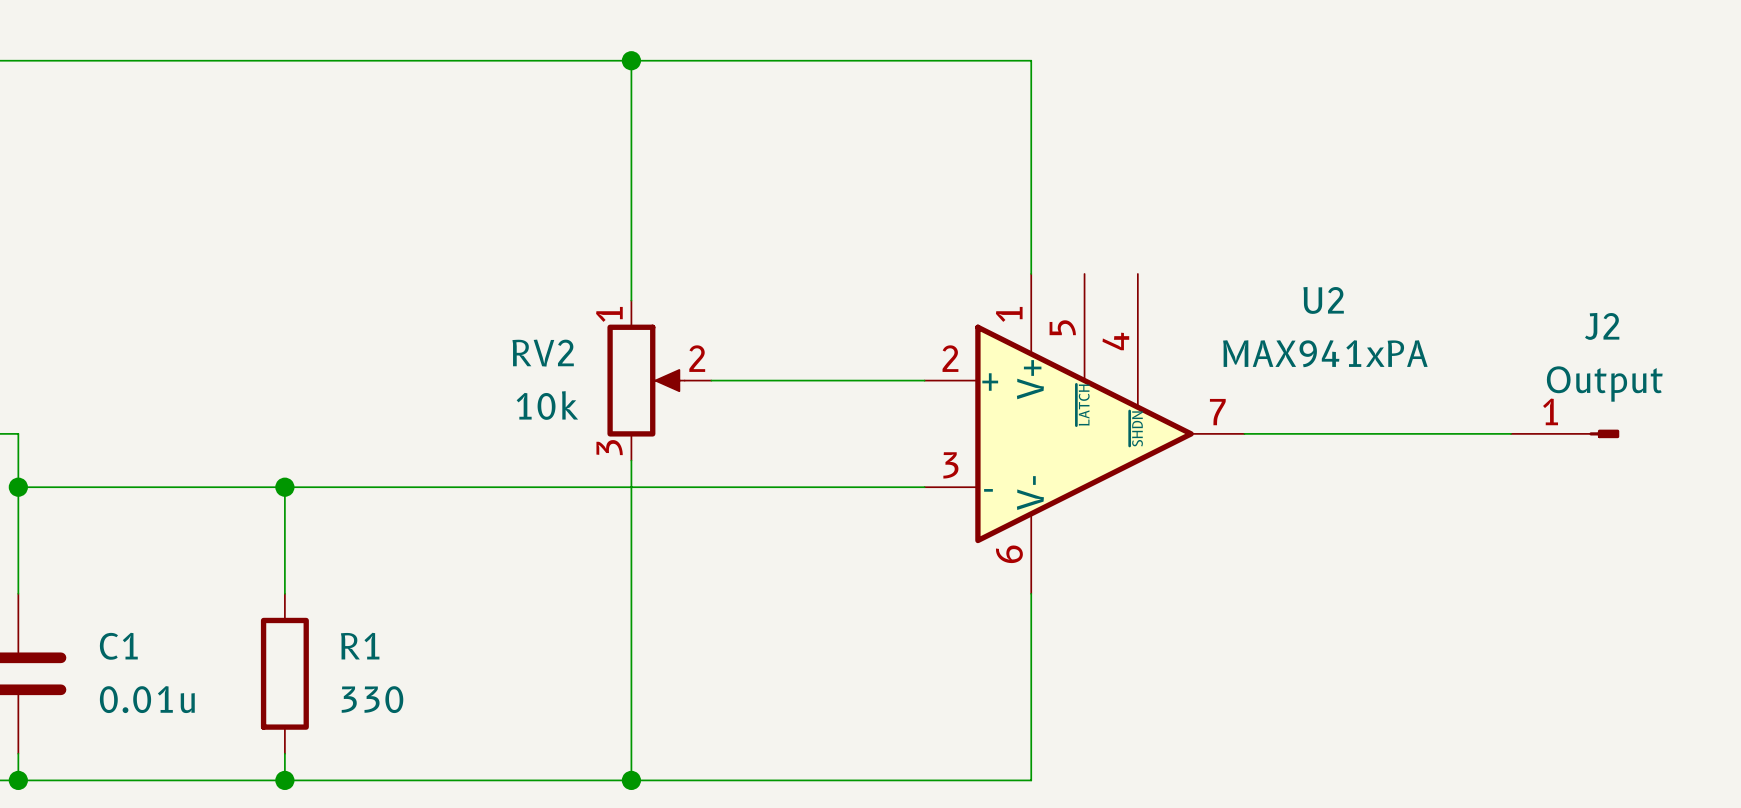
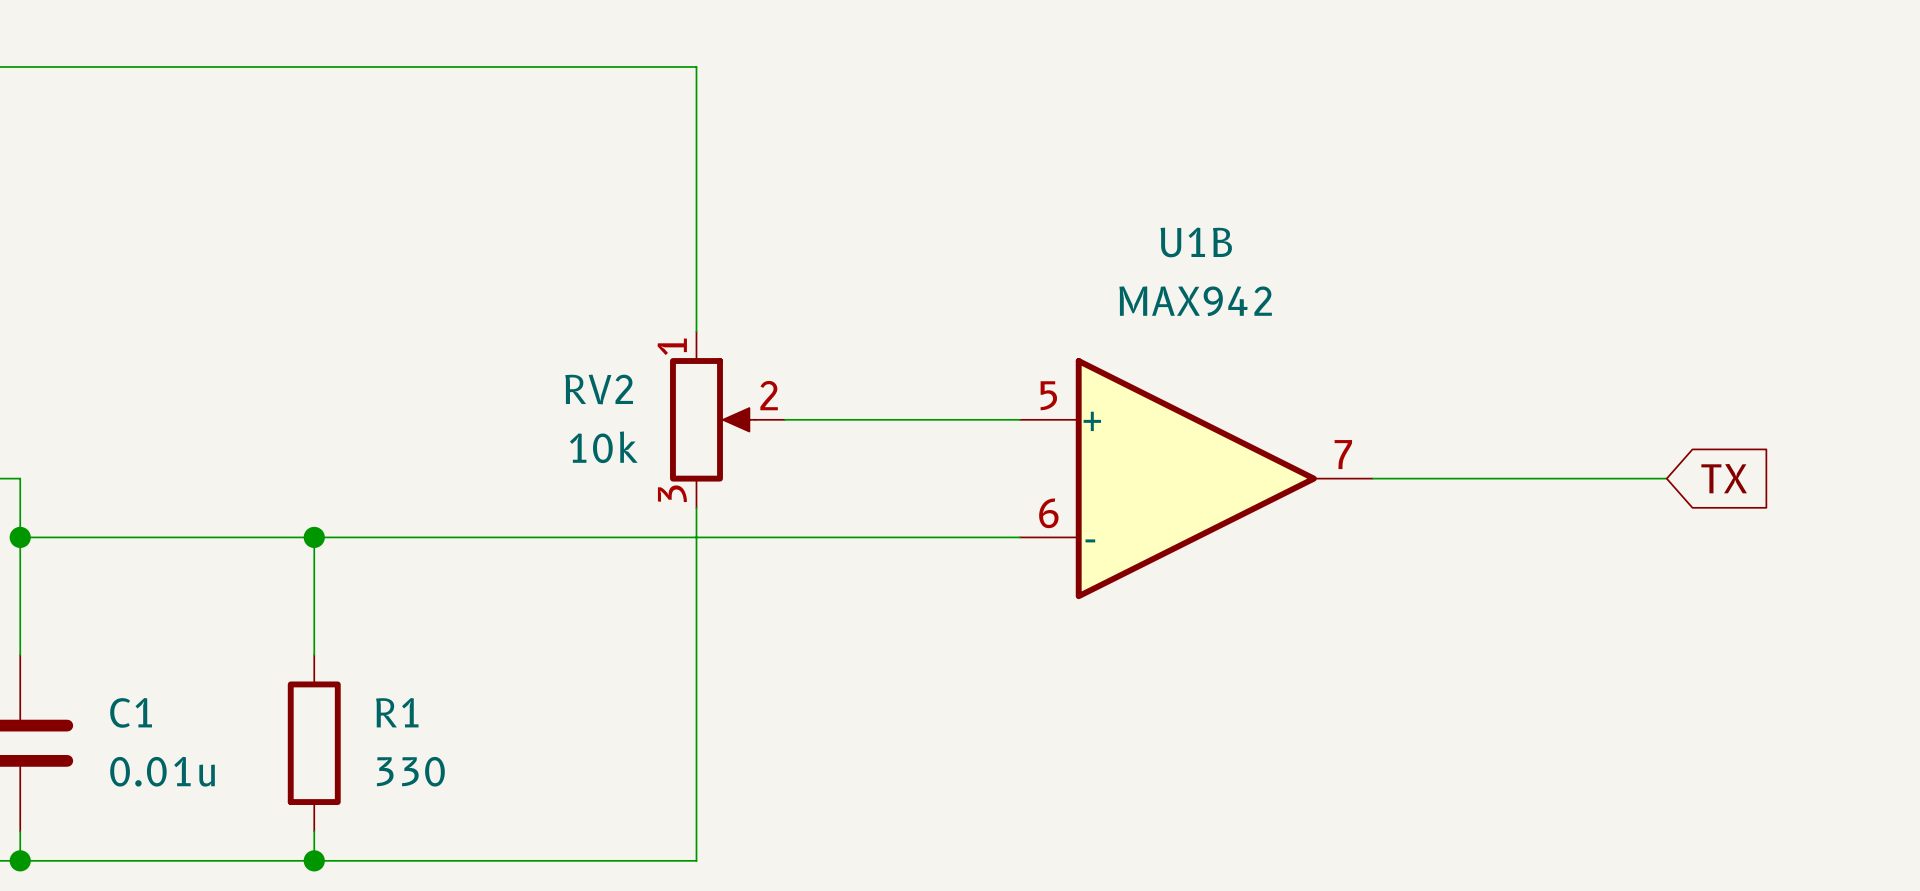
wire: (631, 60) (1031, 60) (1031, 273) -> none
junction: (631, 60) -> none
U2: MAX941xPA (1084, 433) -> none
U1B: none -> MAX942 (1196, 478)
global label: none -> TX (1724, 478)
J2: Output (1565, 433) -> none
wire: (1031, 593) (1031, 780) (631, 780) -> none
junction: (631, 780) -> none

